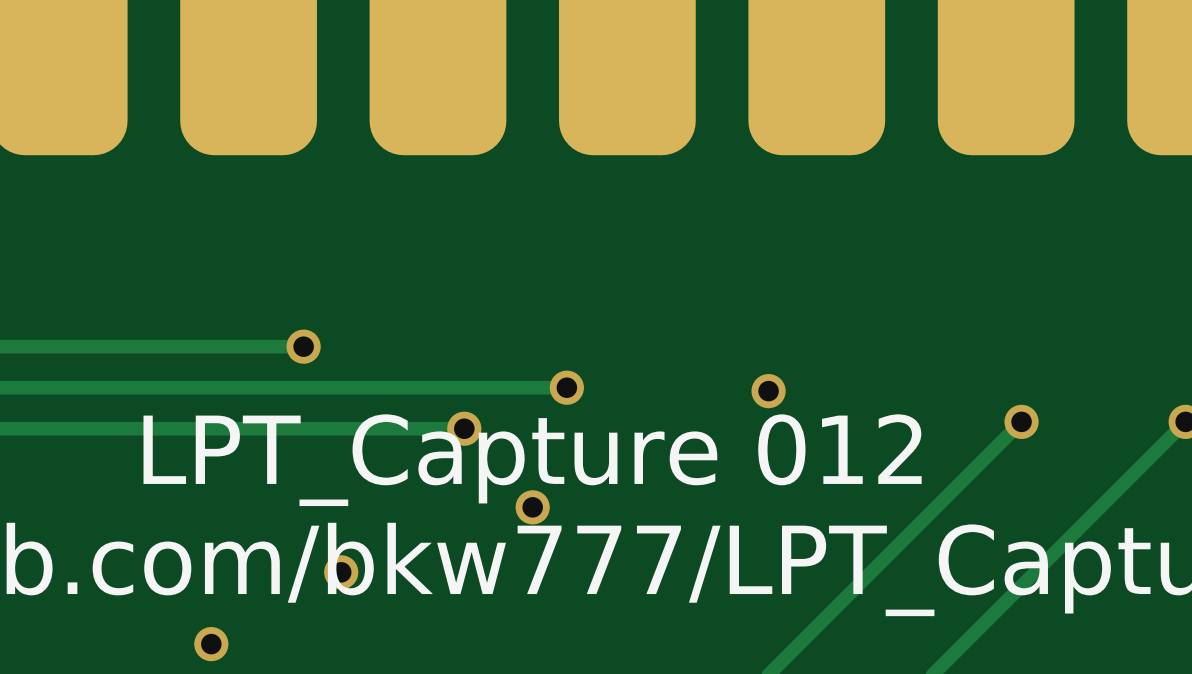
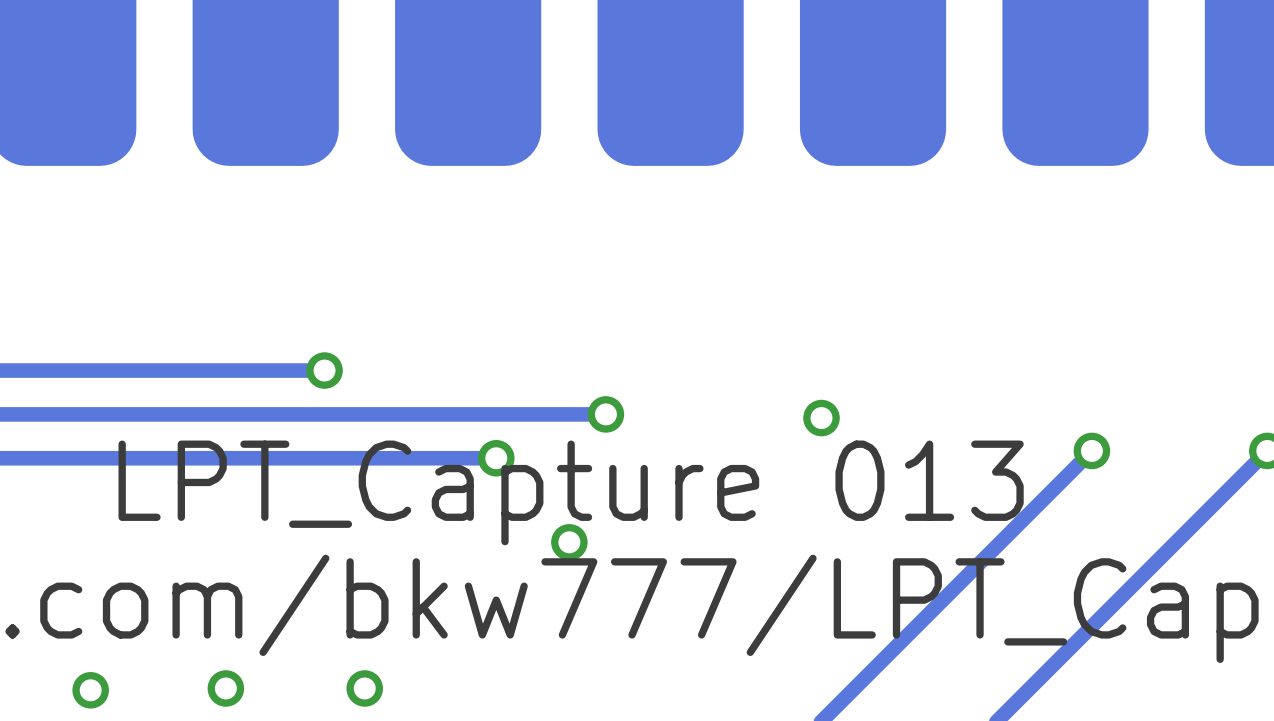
text: LPT_Capture 012 (532, 460) -> LPT_Capture 013 (571, 492)
via position: (341, 572) -> (364, 688)
via: none -> (90, 690)

